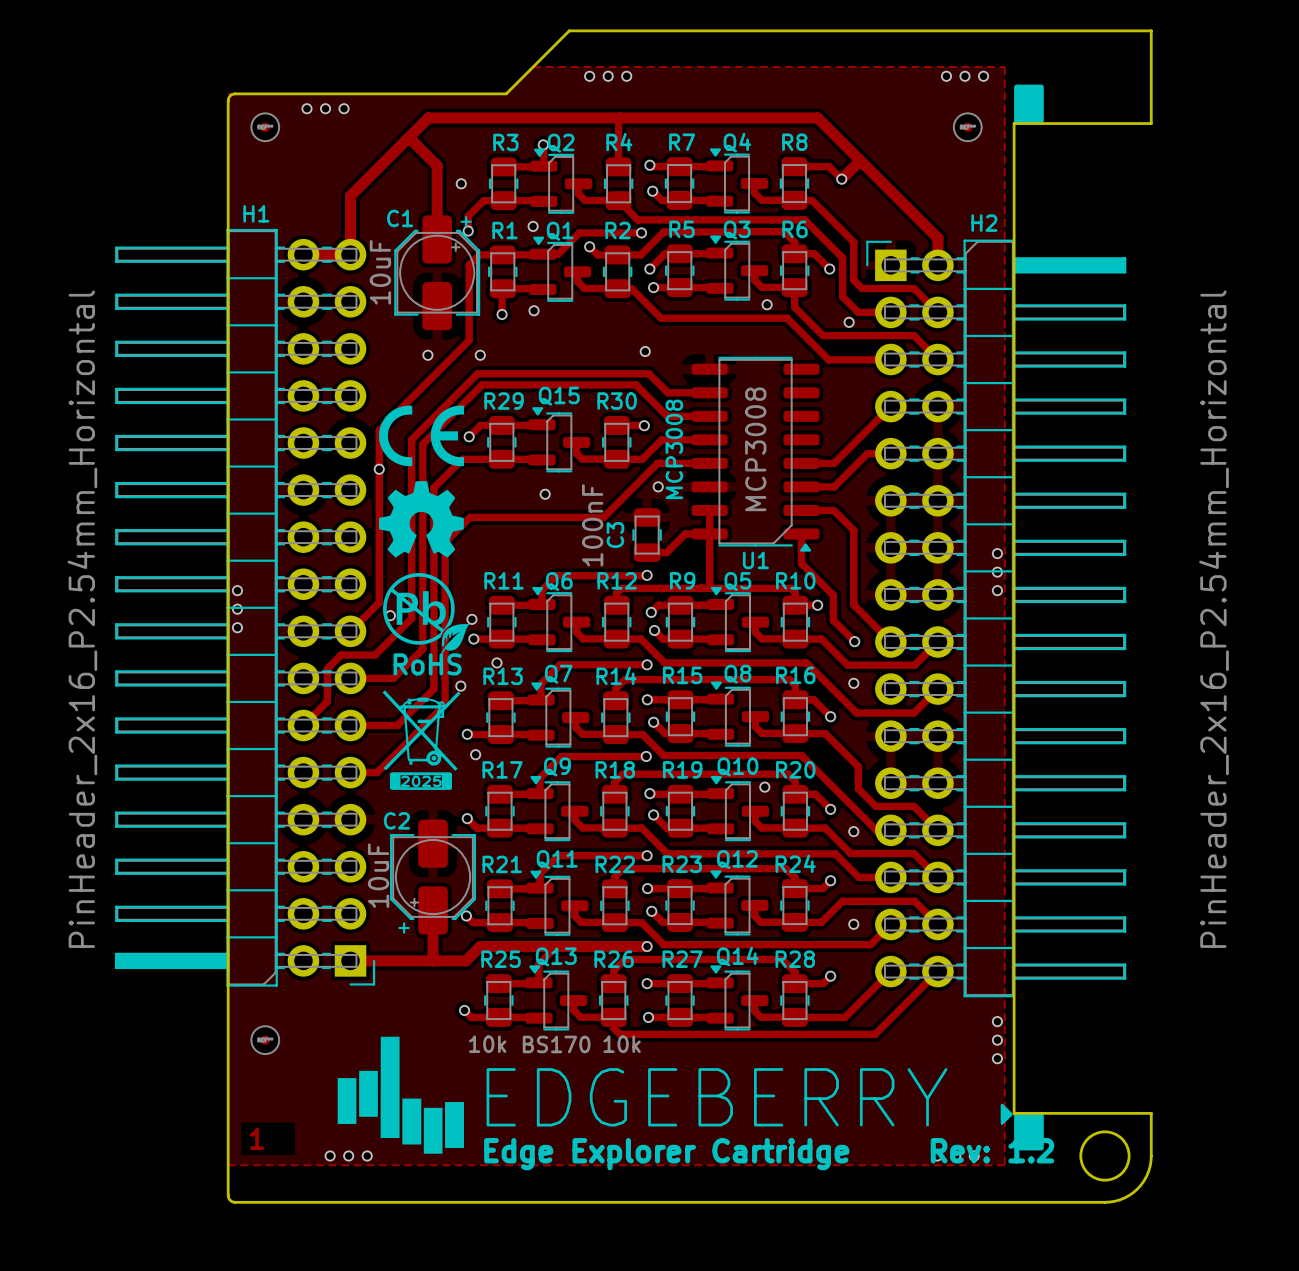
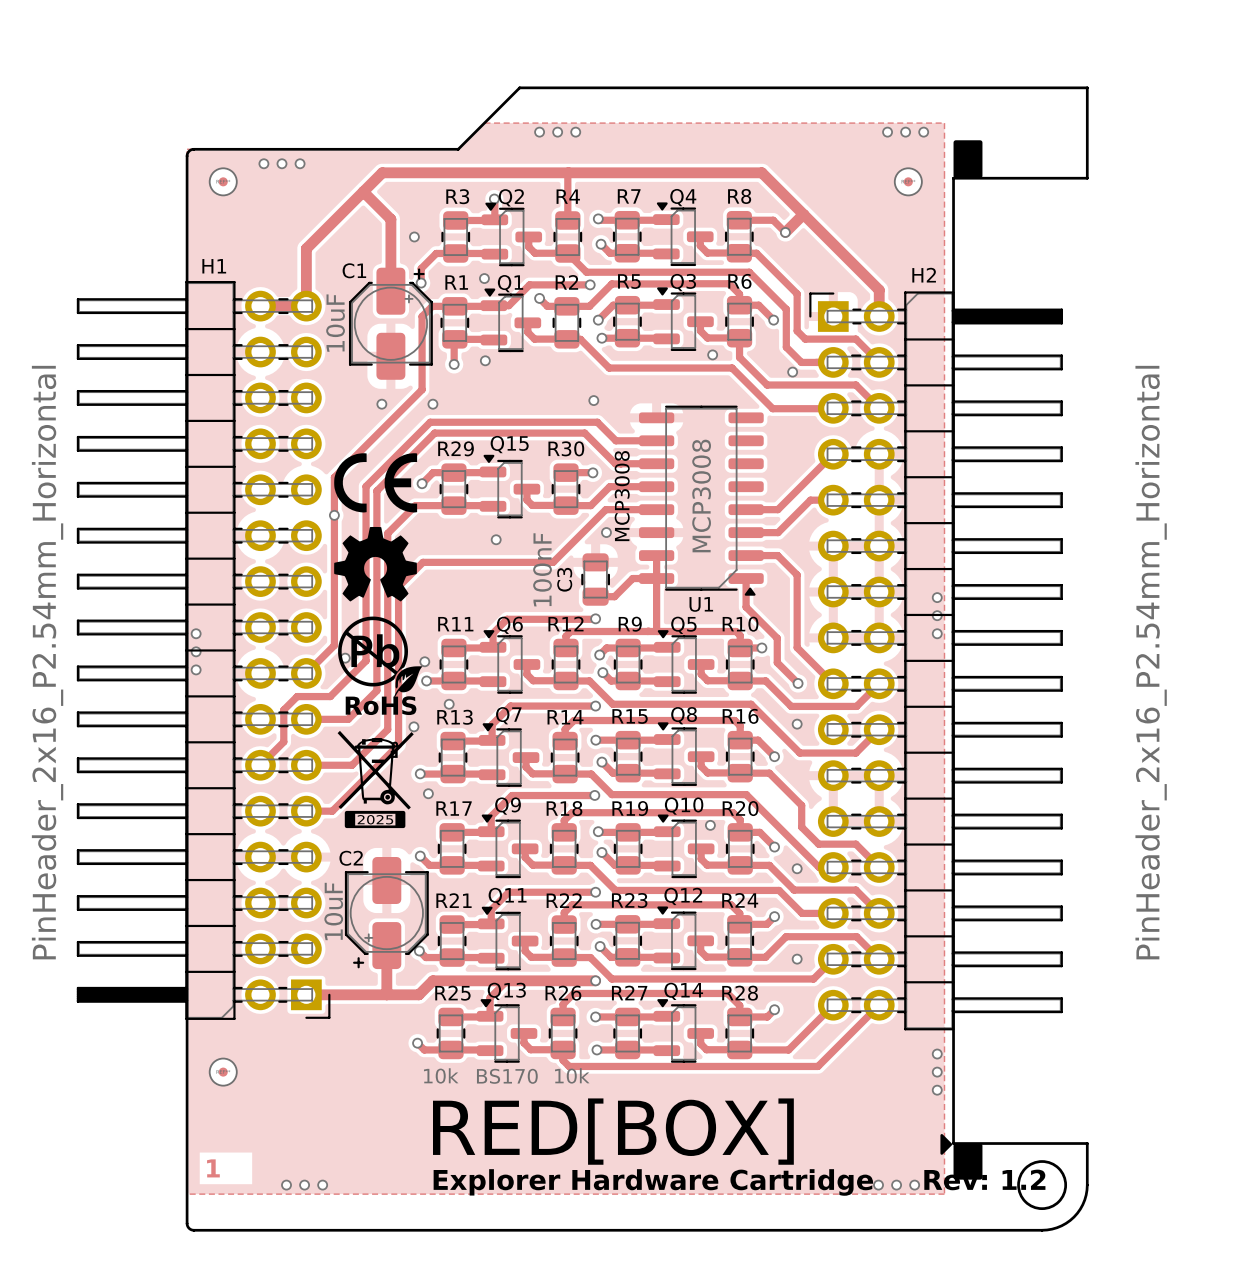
drawing: [337, 1036, 464, 1154] -> none
text: EDGEBERRY (716, 1097) -> RED[BOX] (613, 1131)
text: Edge Explorer Cartridge Rev: 1.2 (769, 1154) -> Explorer Hardware Cartridge Rev: 1.2 (739, 1182)

